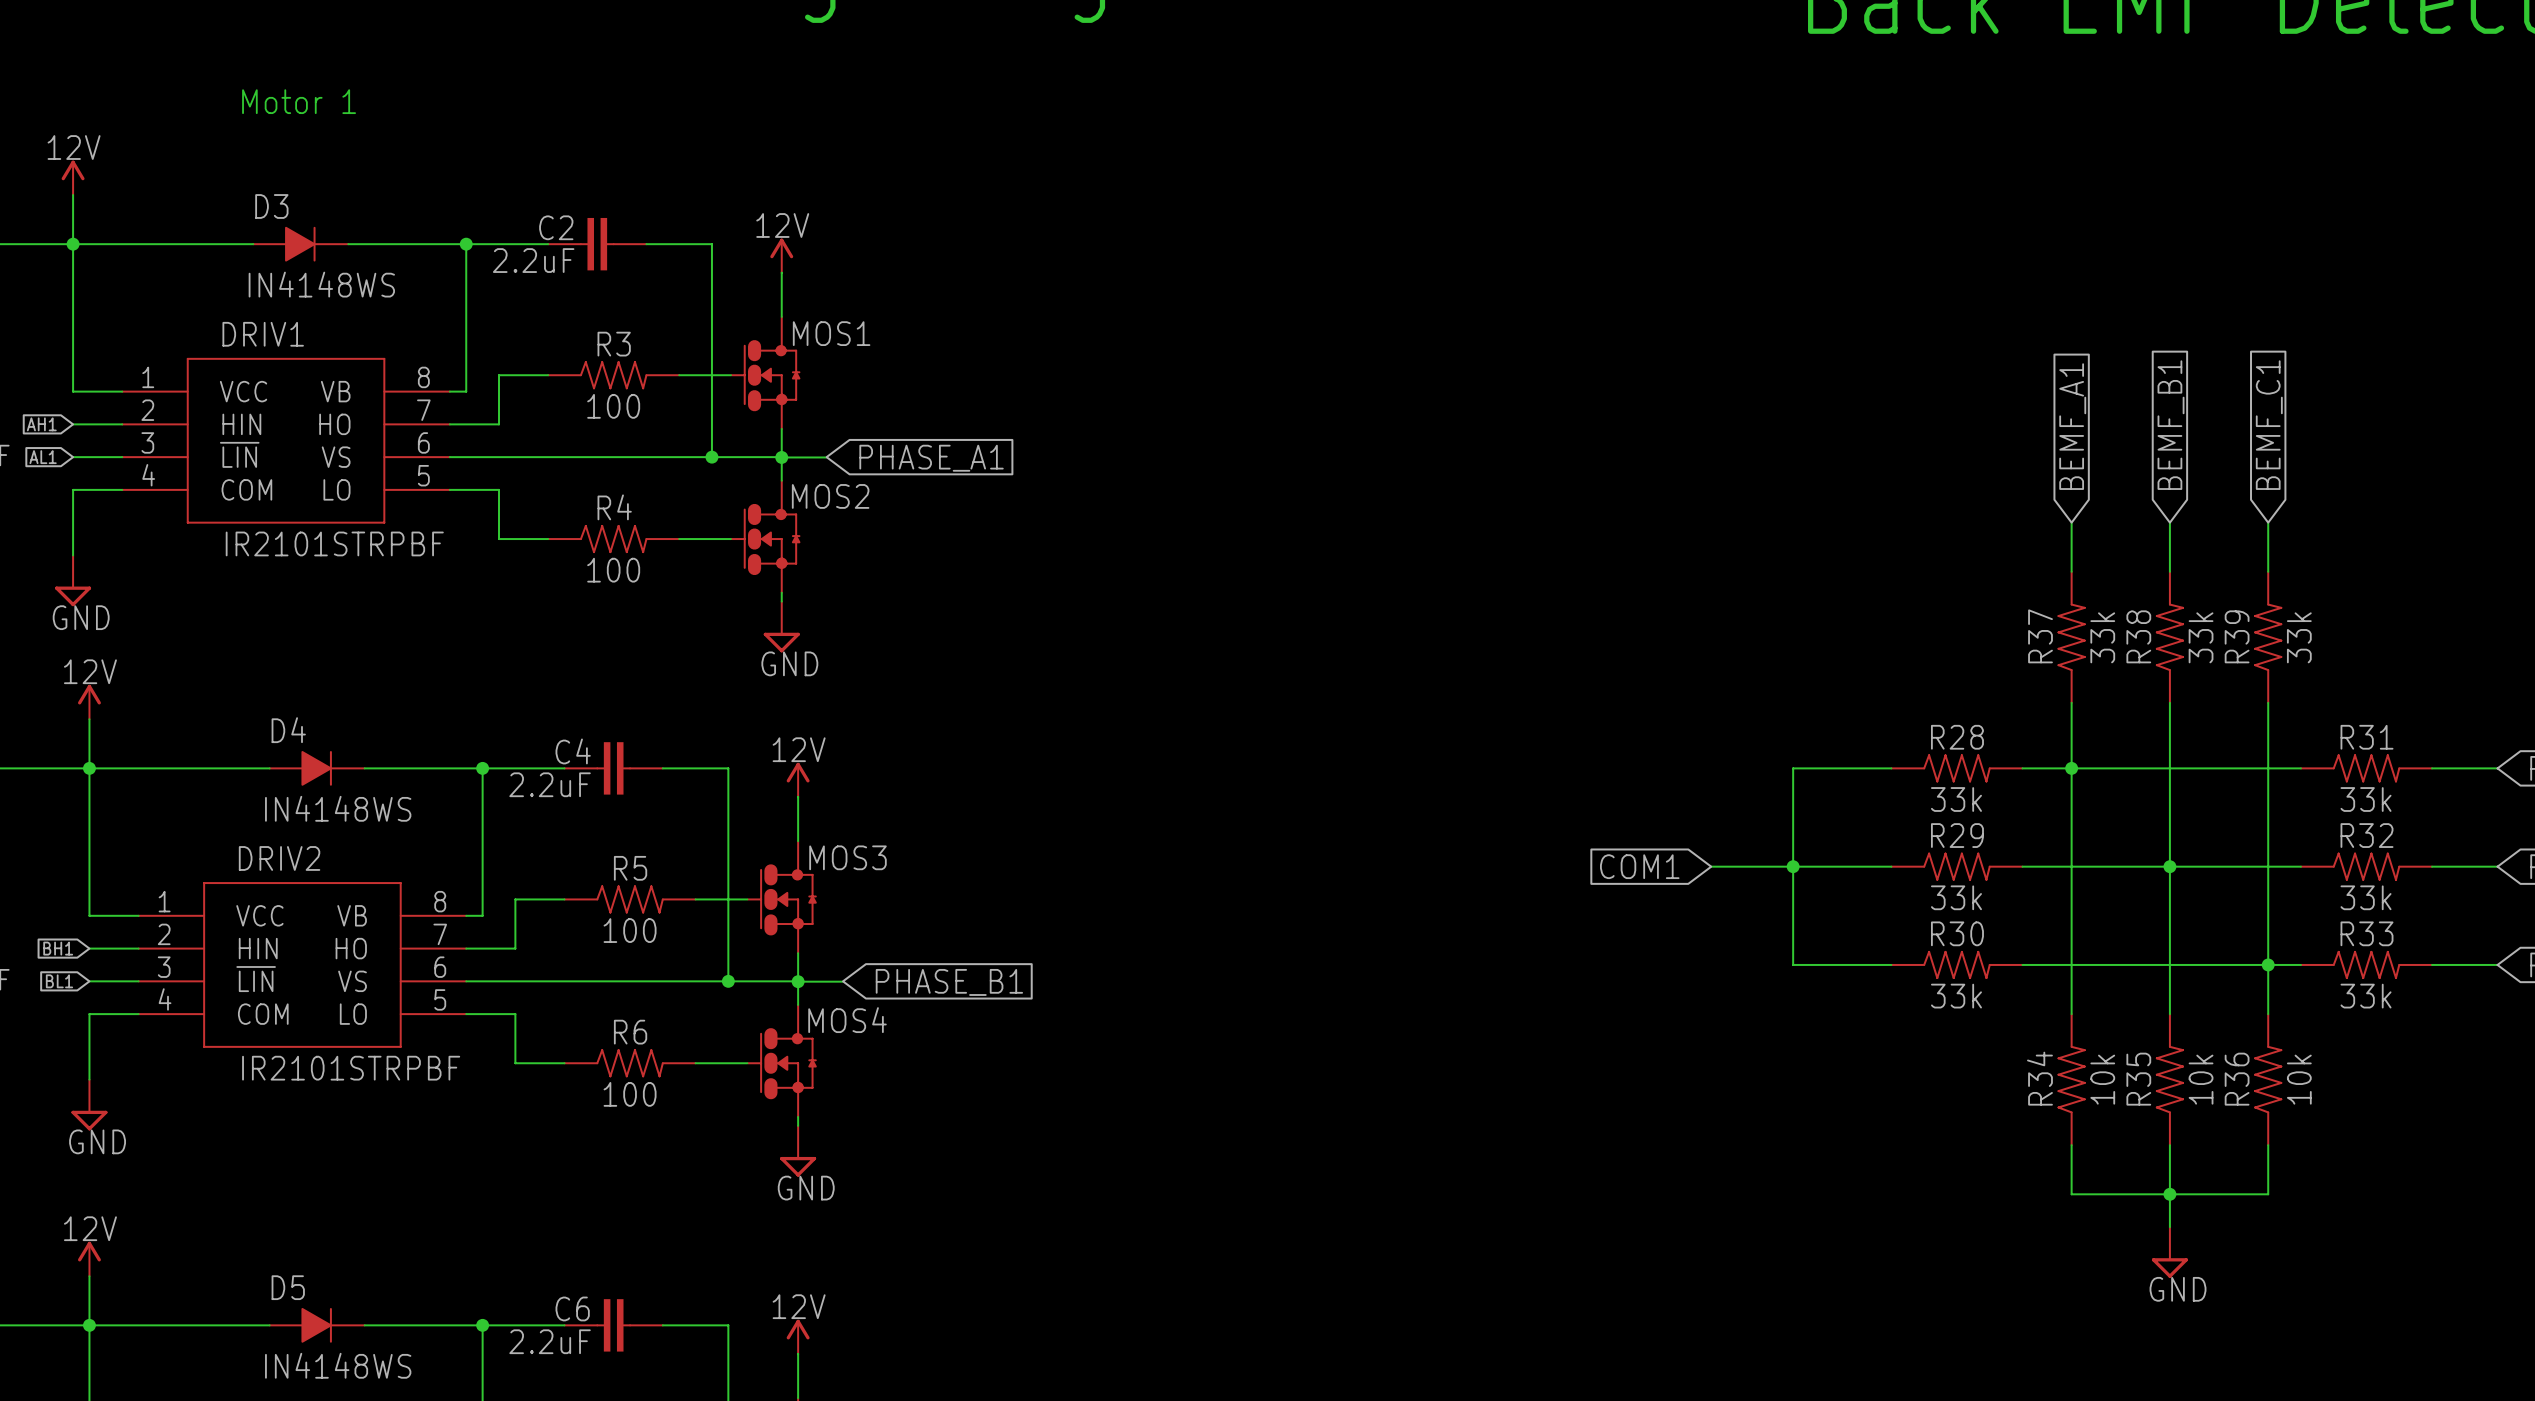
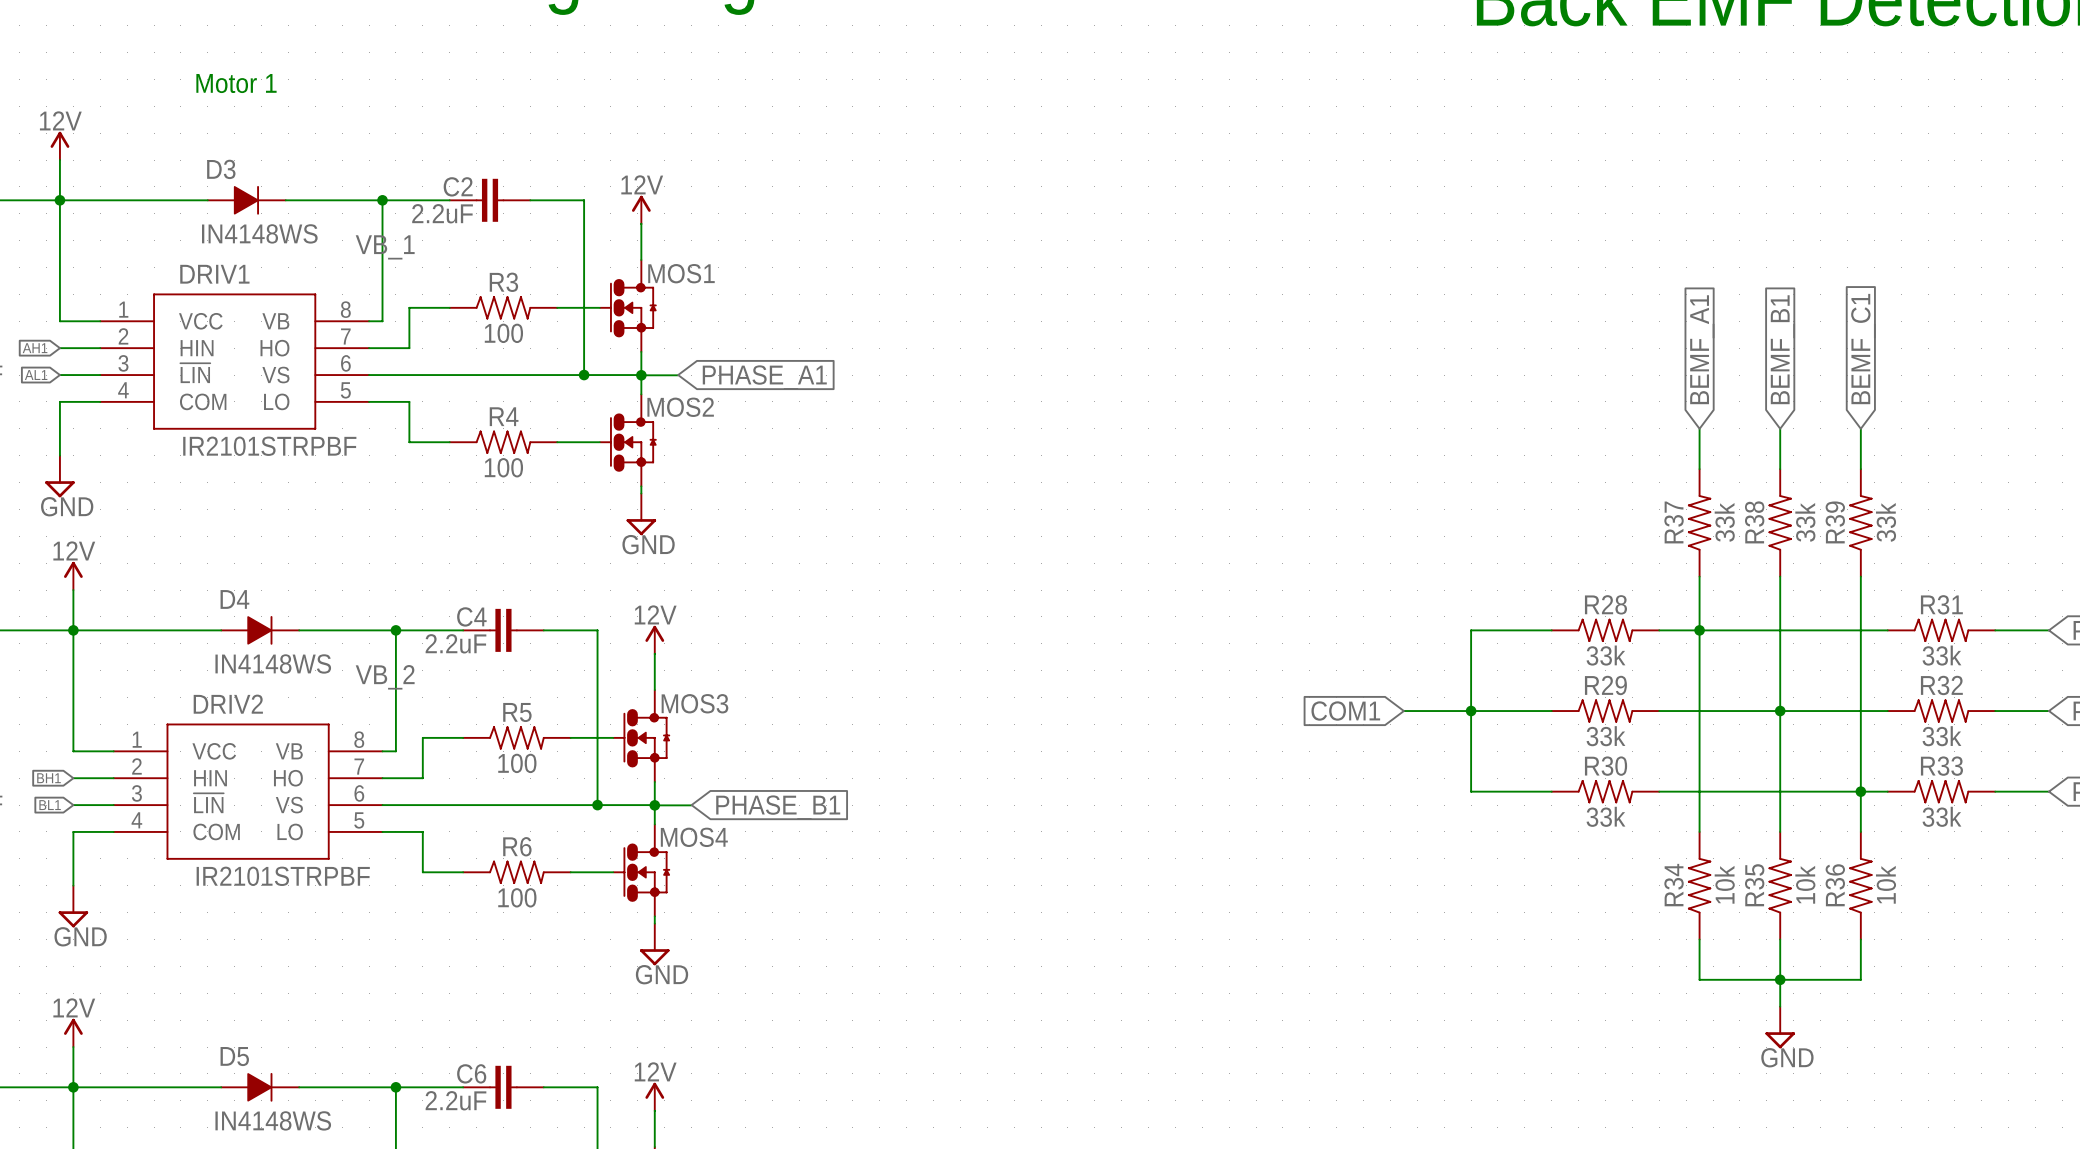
label: none -> VB_1 (385, 247)
label: none -> VB_2 (385, 677)

